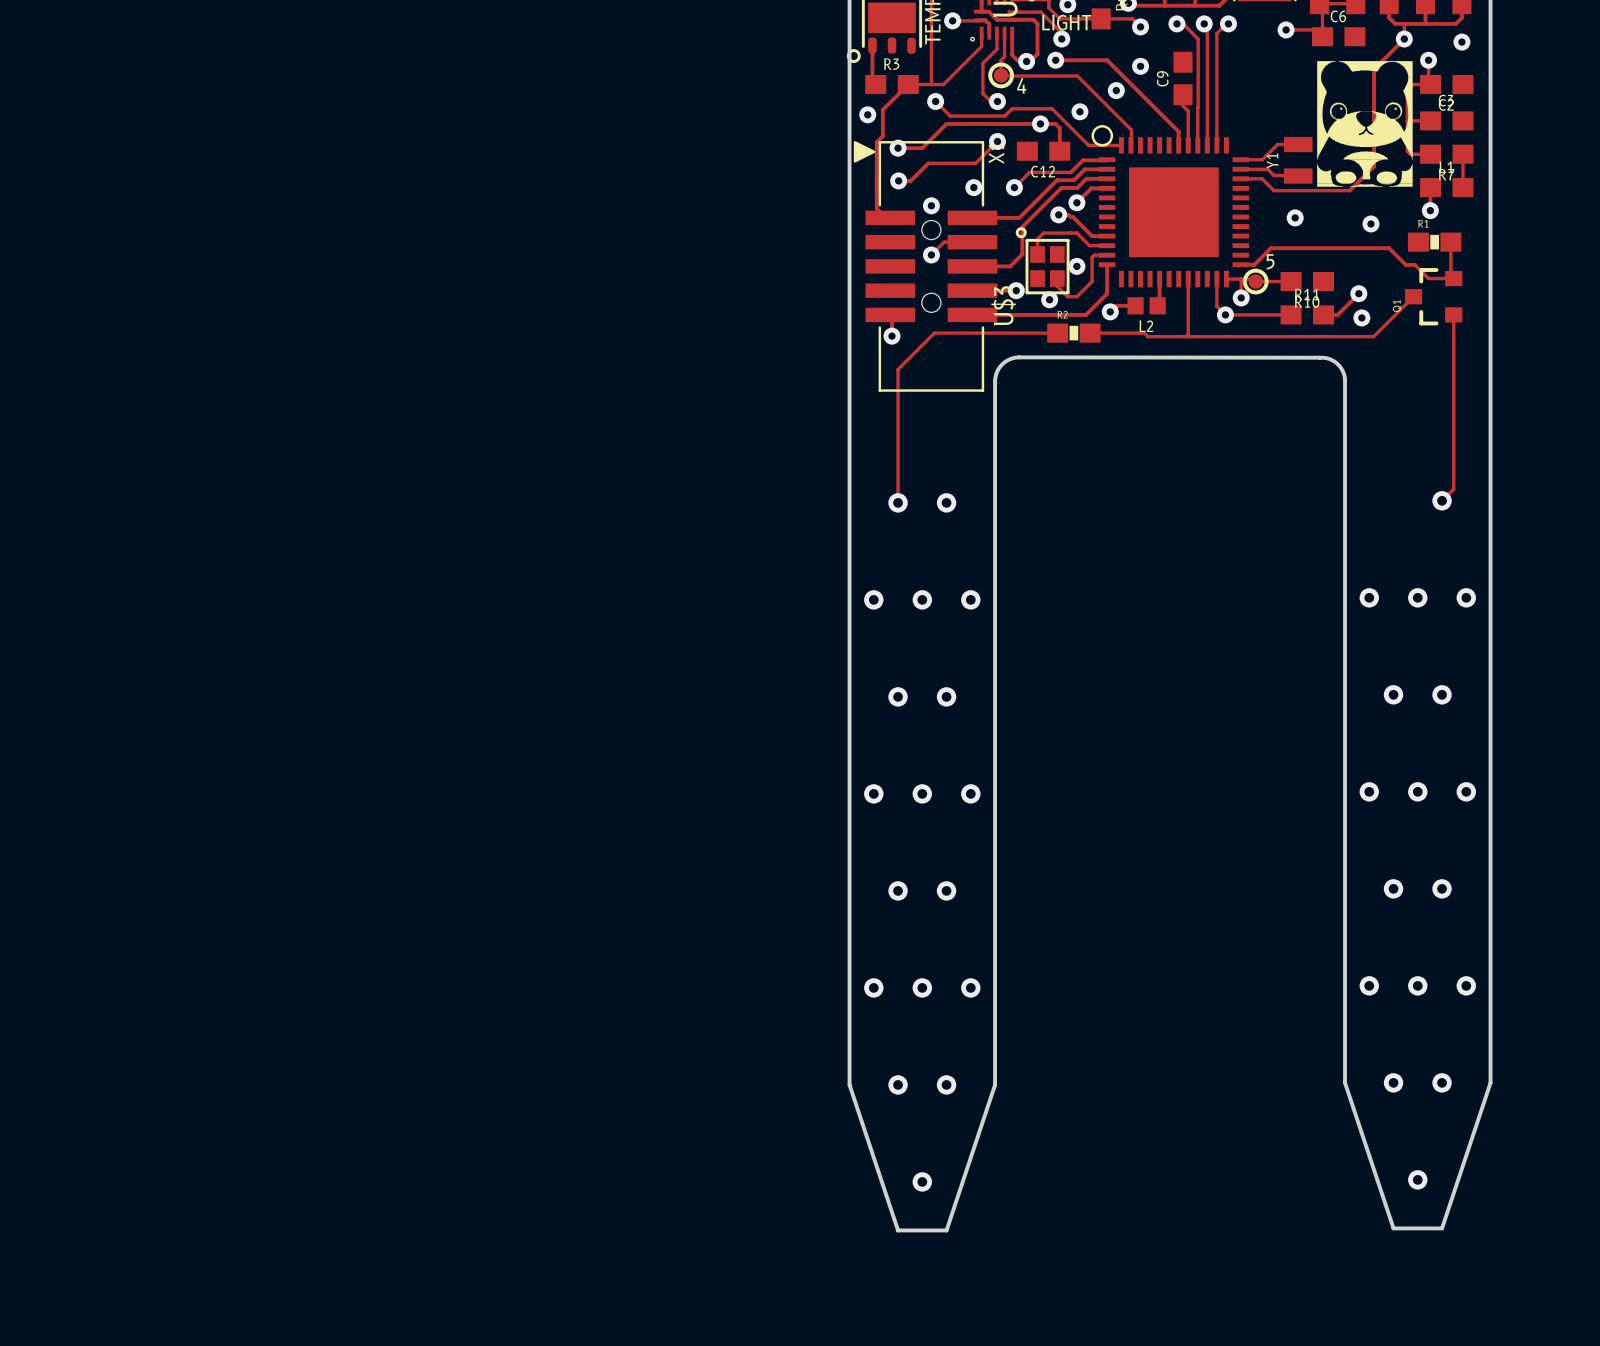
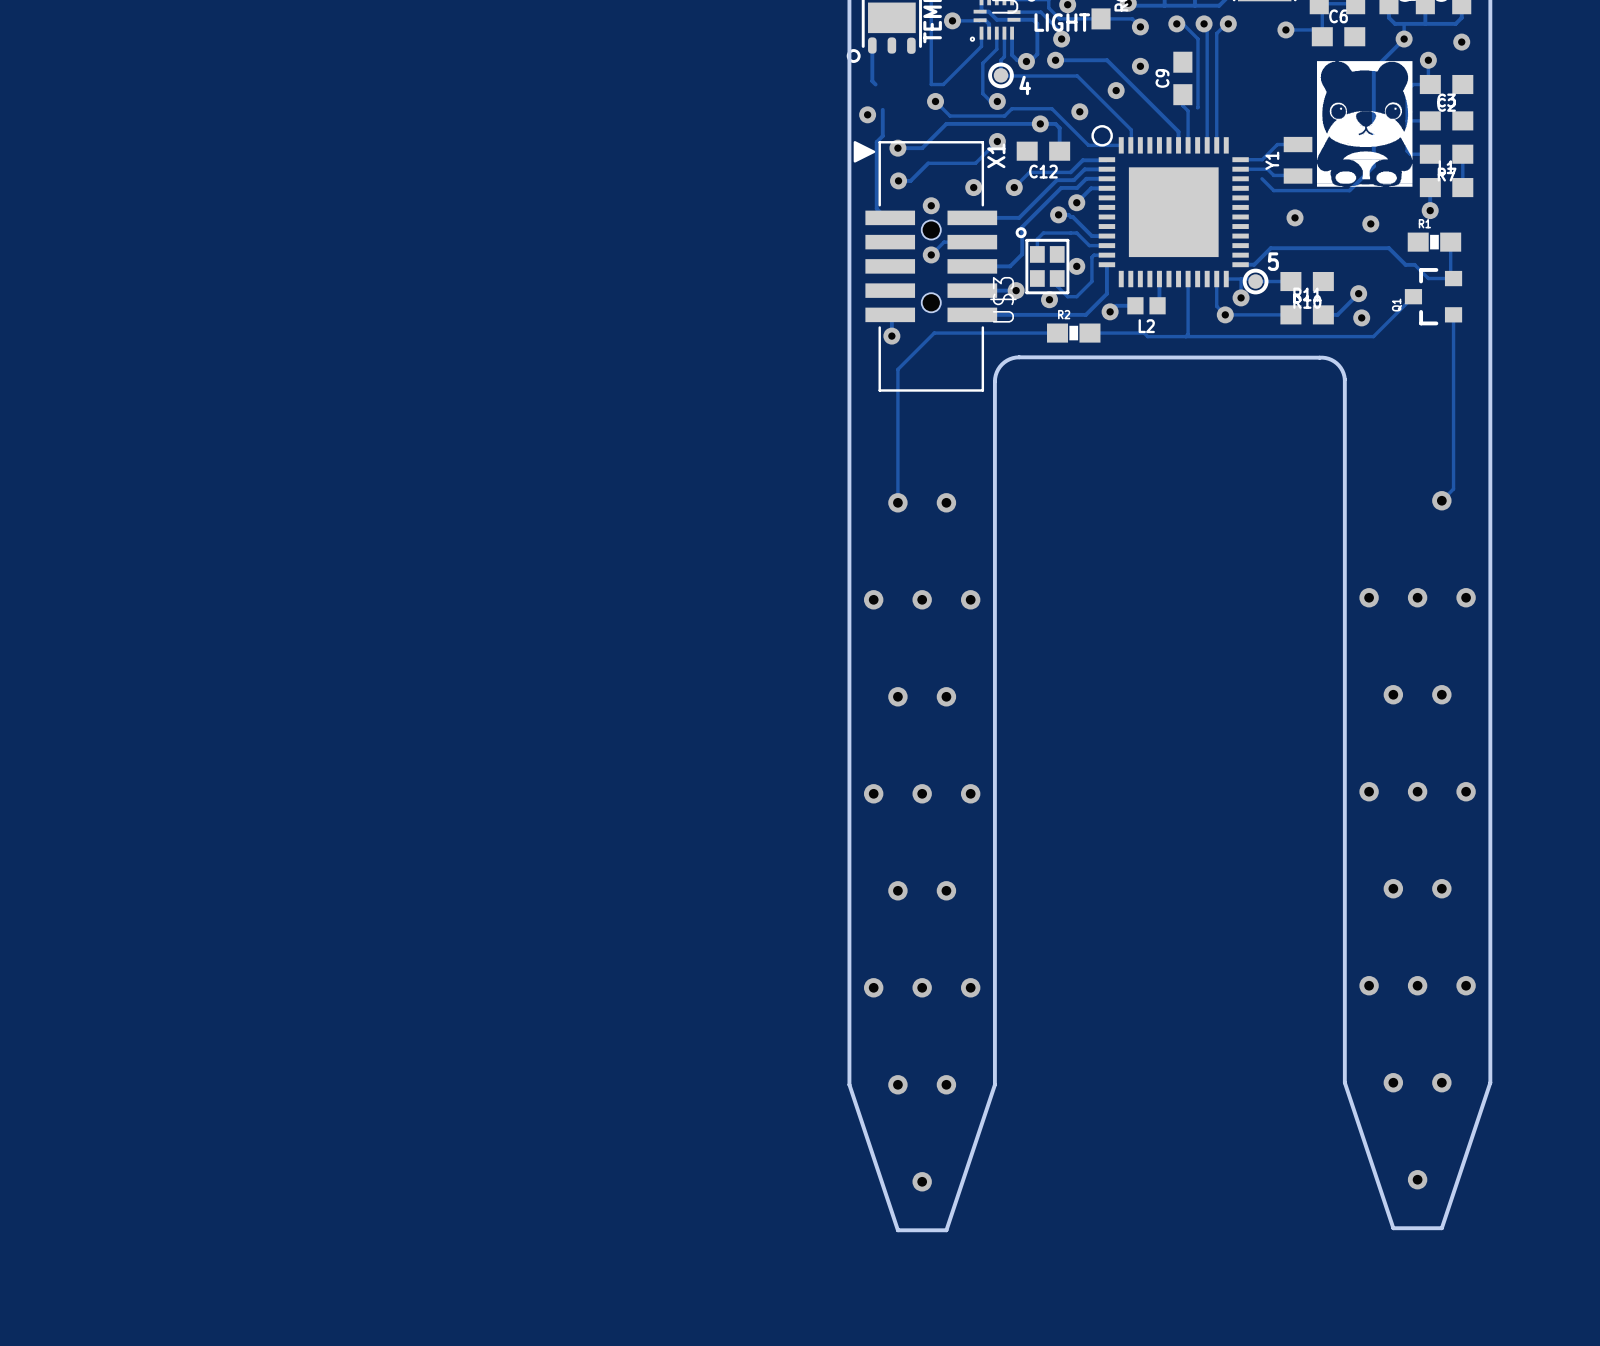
R3: (891, 84) -> none
track: (908, 84) (931, 84) -> none
track: (908, 84) (882, 109) -> none
track: (1197, 107) (1197, 145) -> none
track: (1240, 178) (1262, 178) -> none

